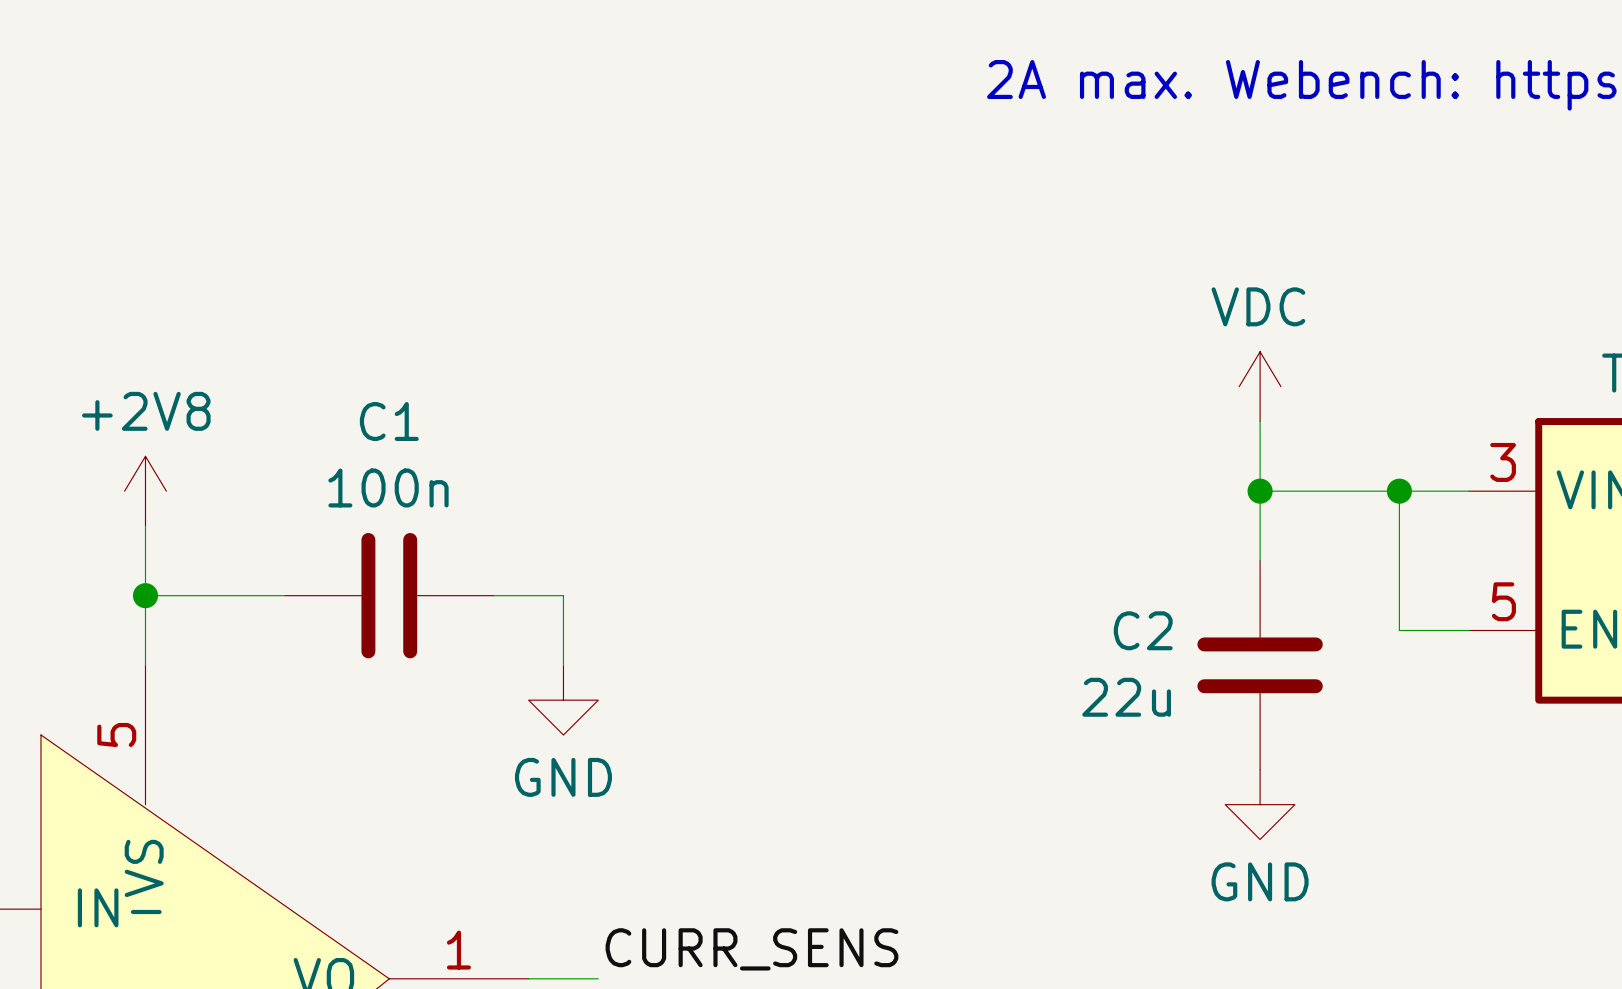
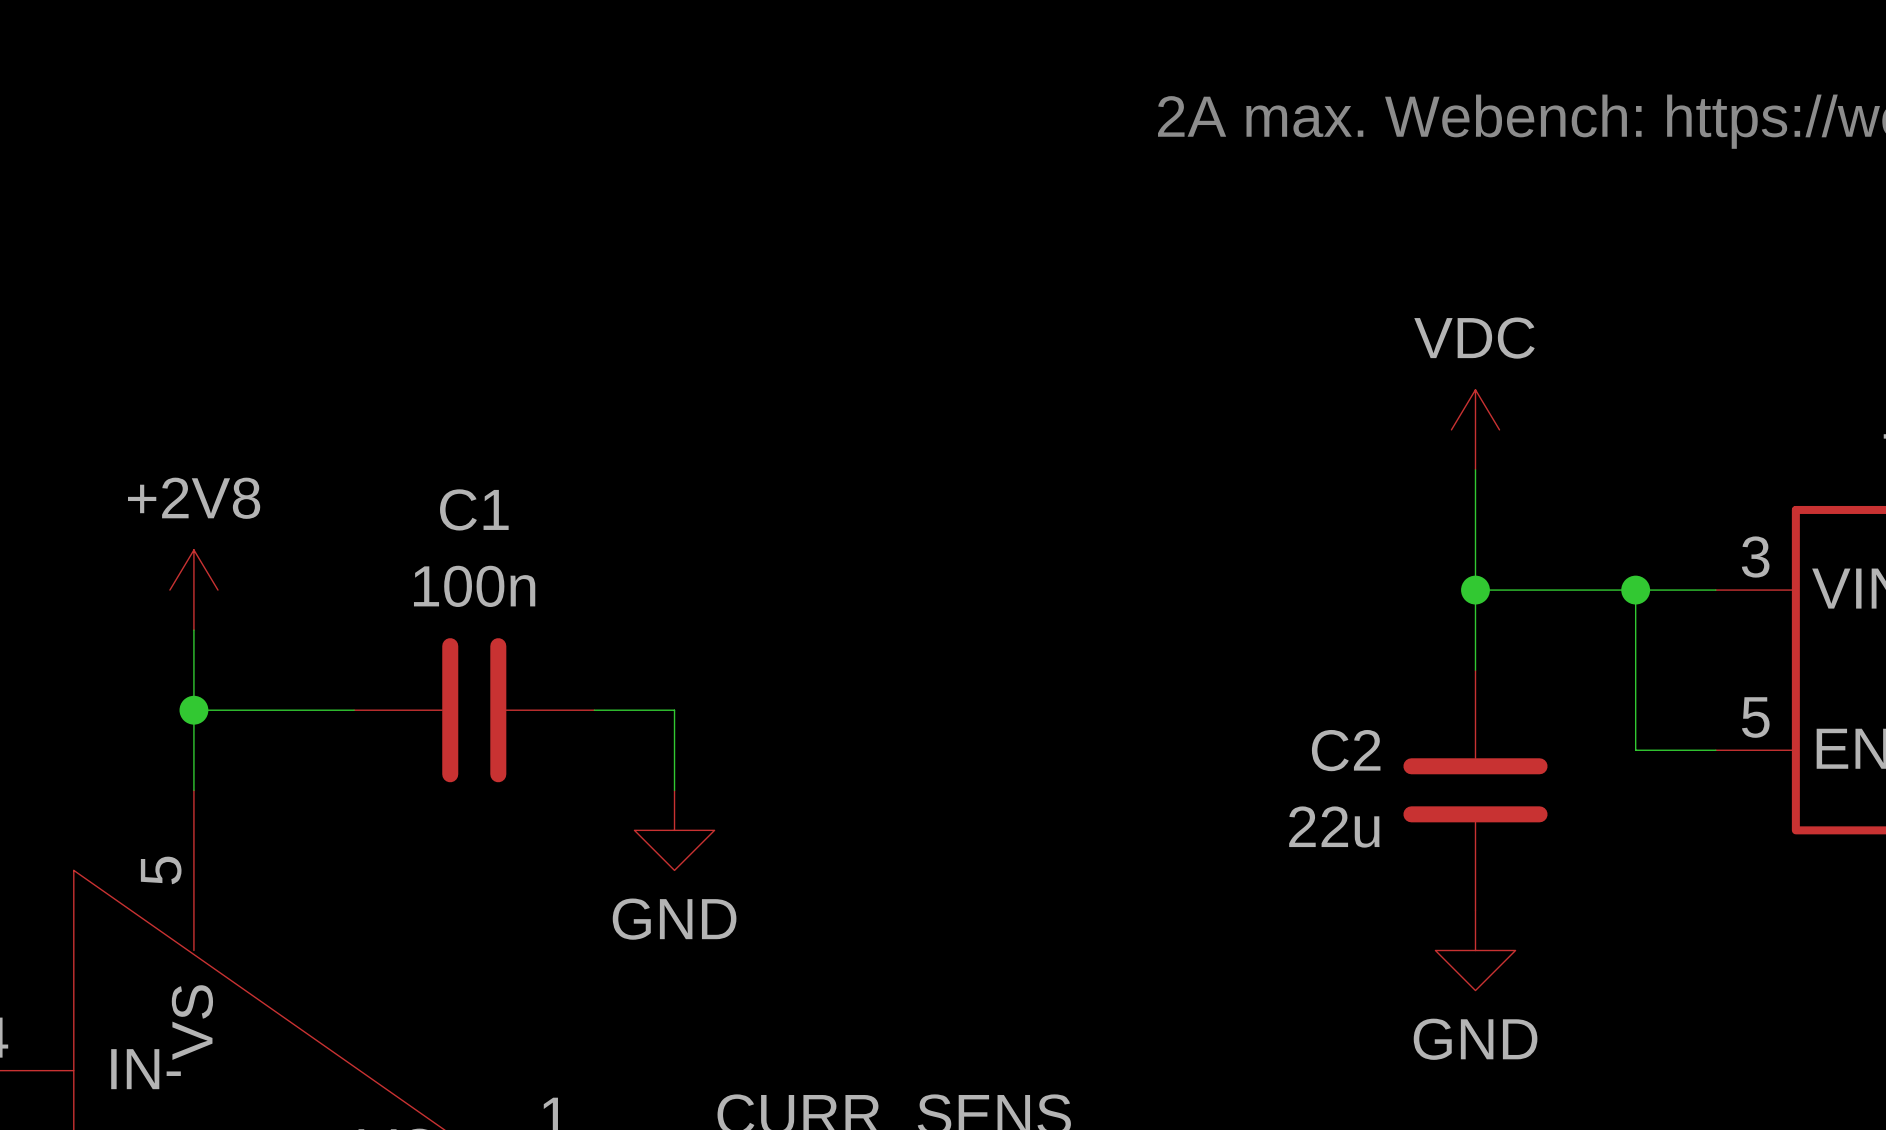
power symbol position: VDC (1260, 386) -> VDC (1475, 429)

